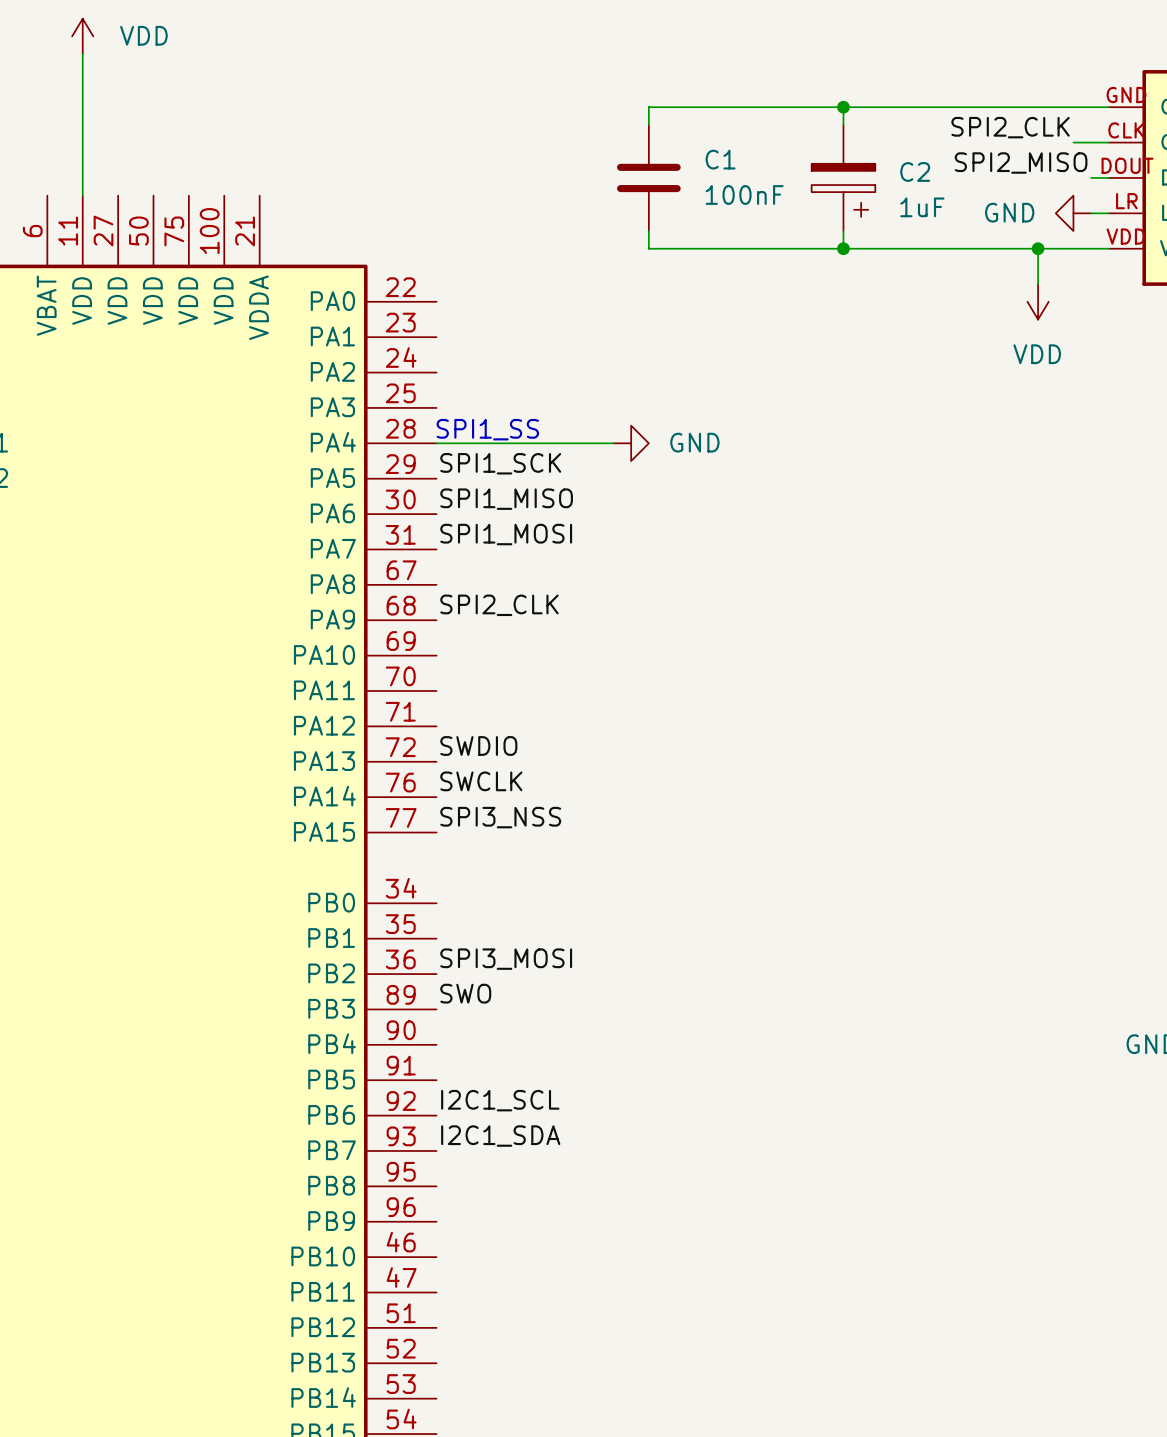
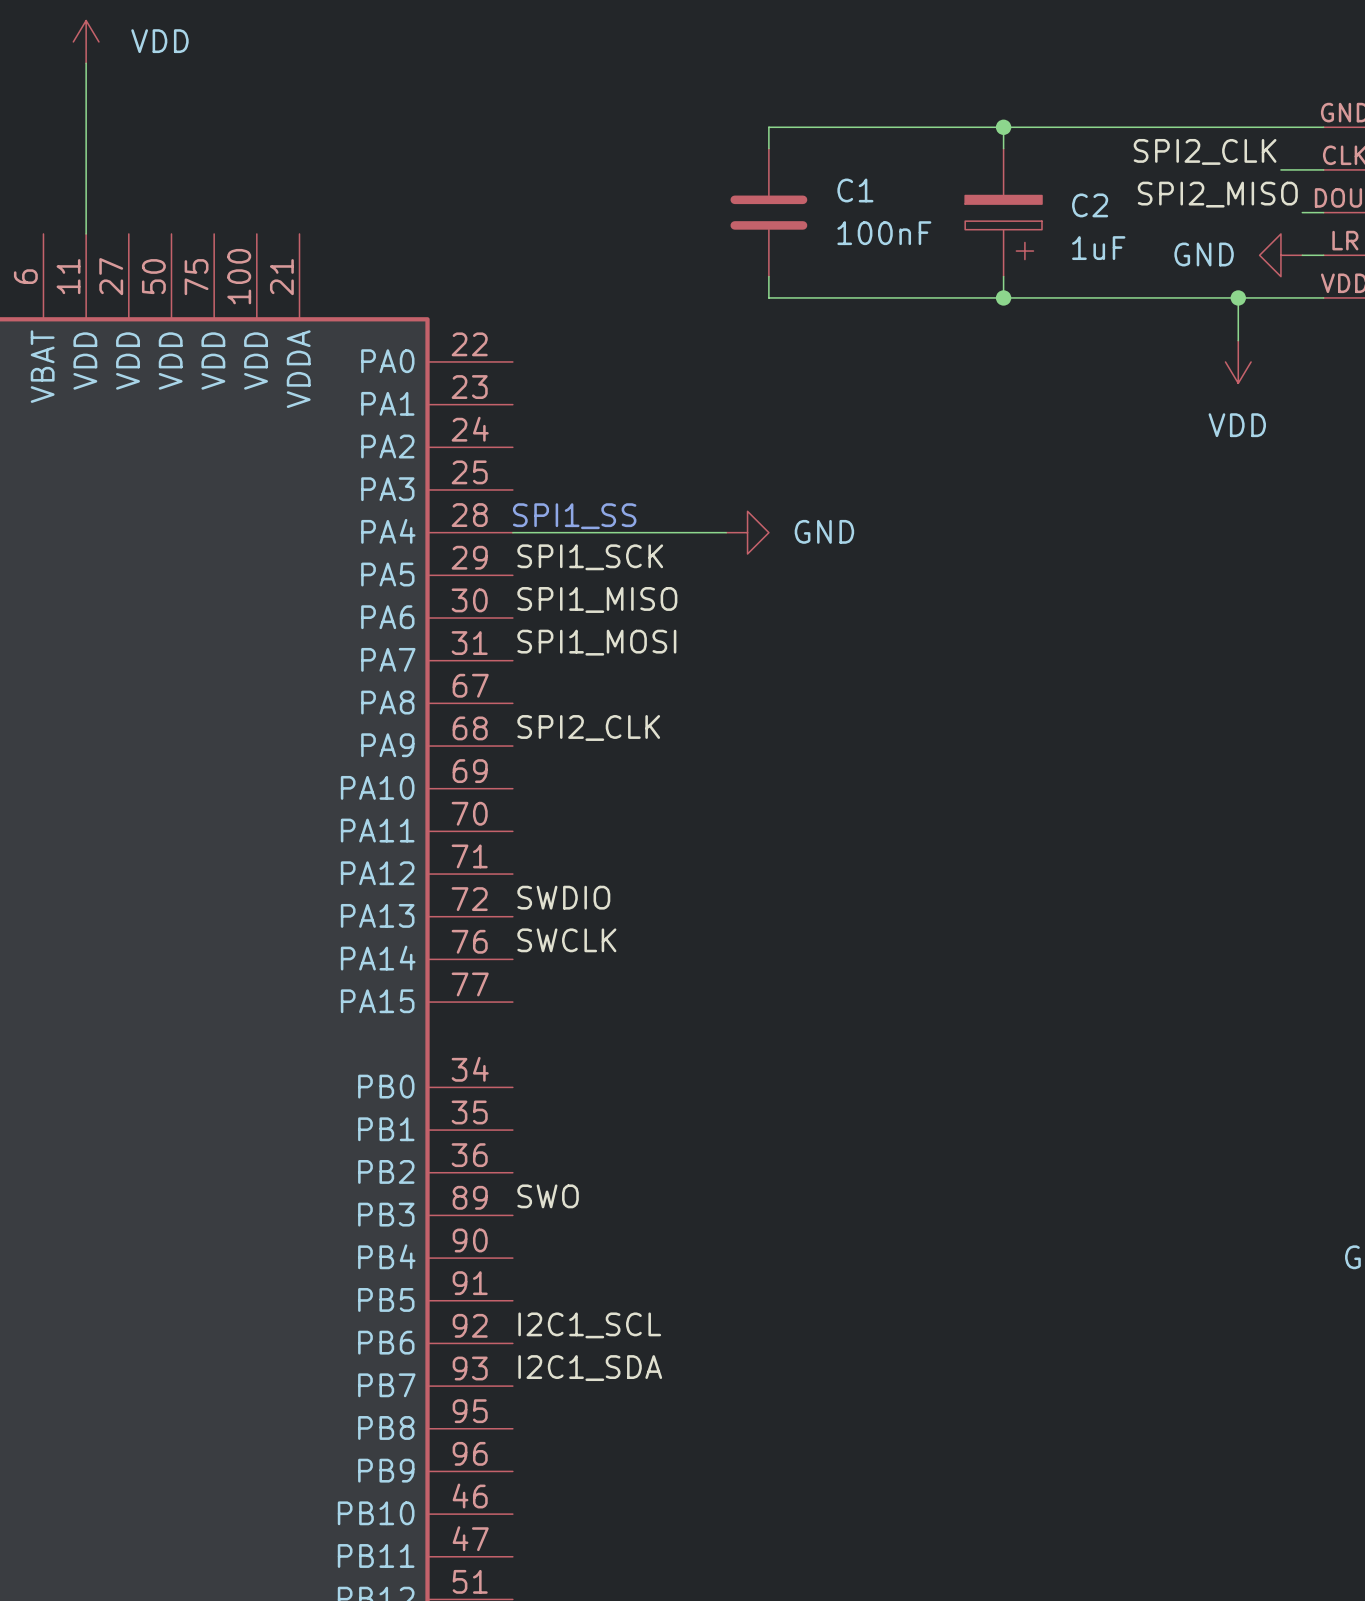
label: SPI3_NSS (500, 817) -> none
label: SPI3_MOSI (506, 959) -> none

